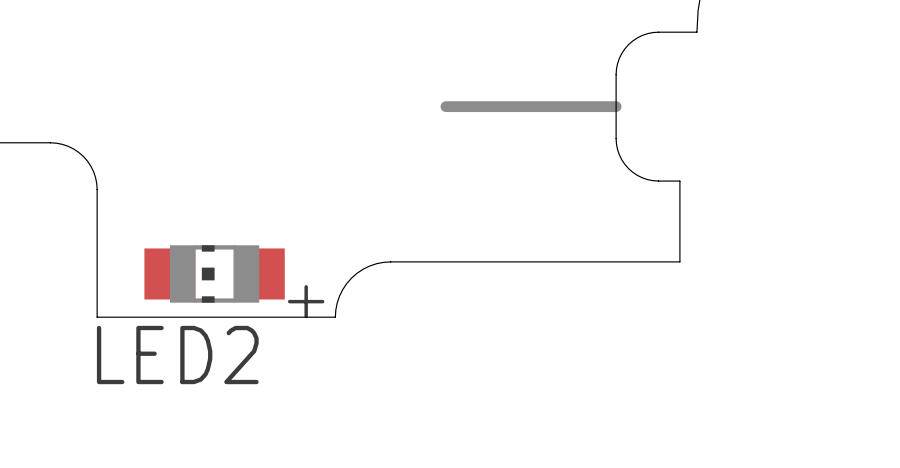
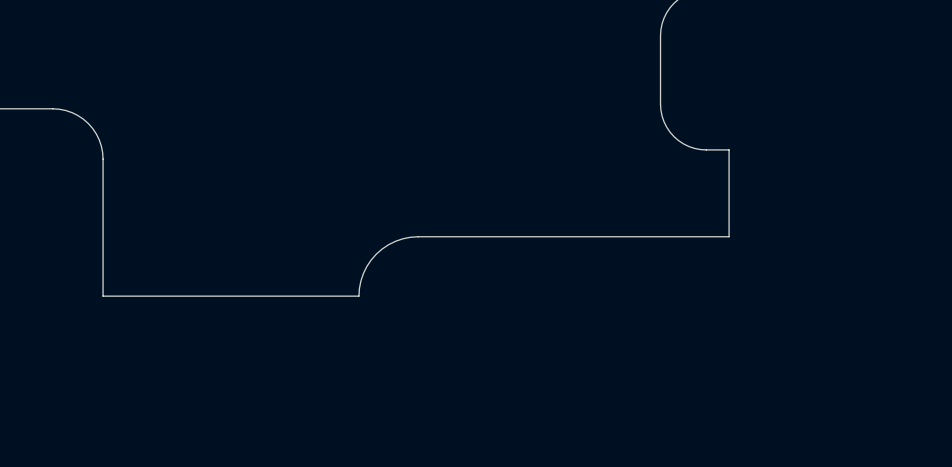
line: (445, 106) (616, 106) -> none
LED2: (214, 273) -> none

